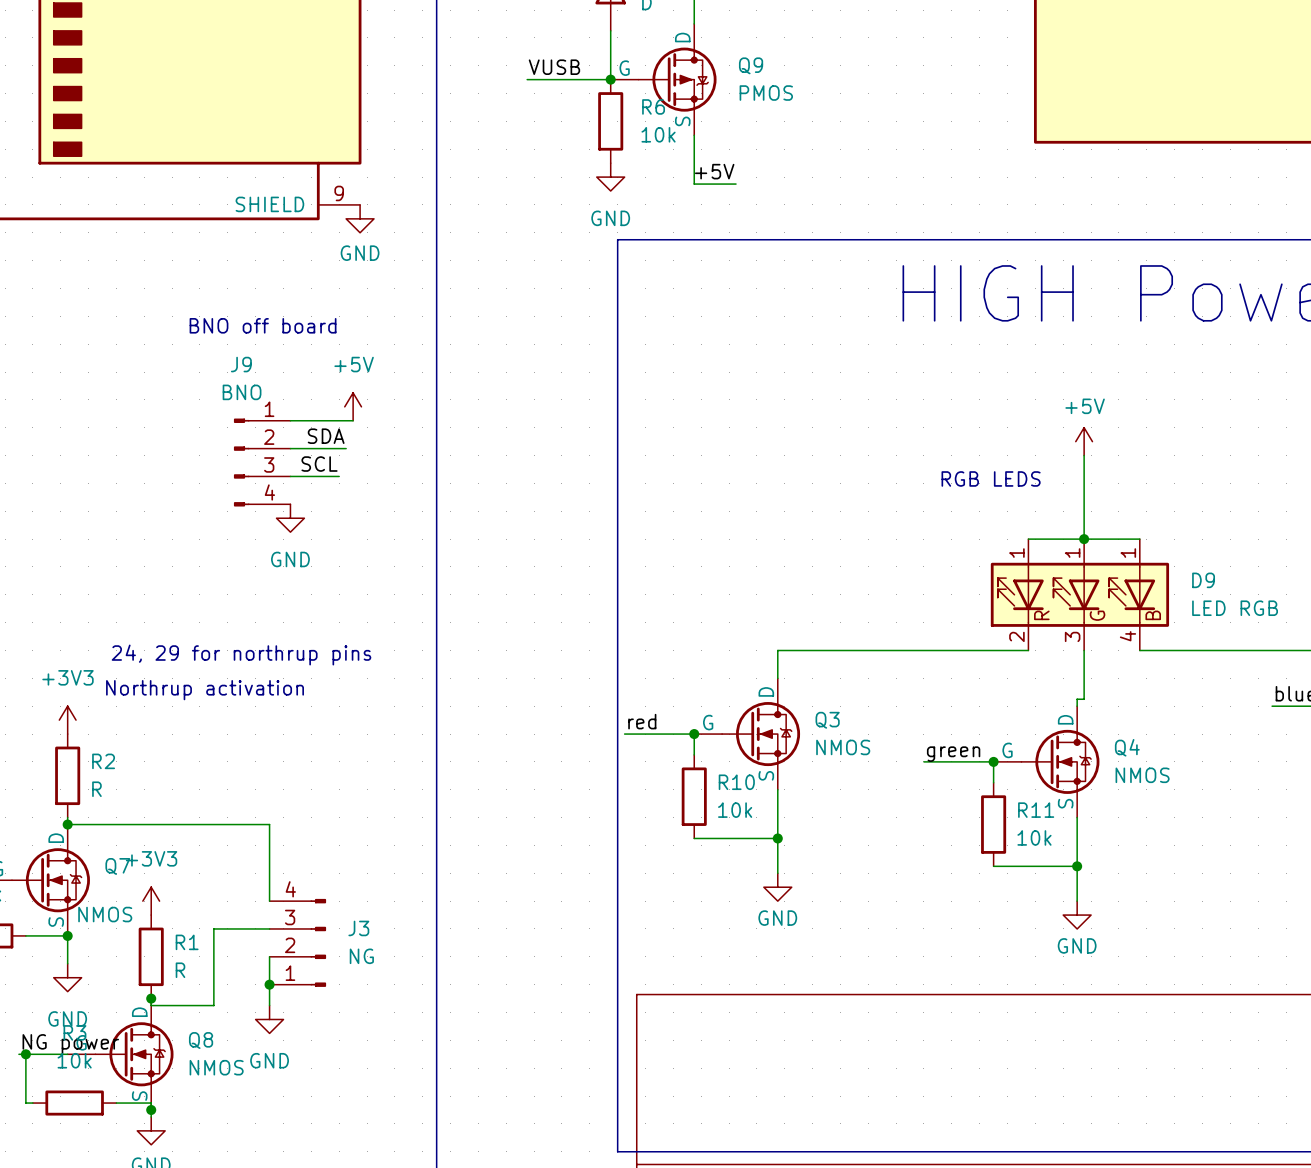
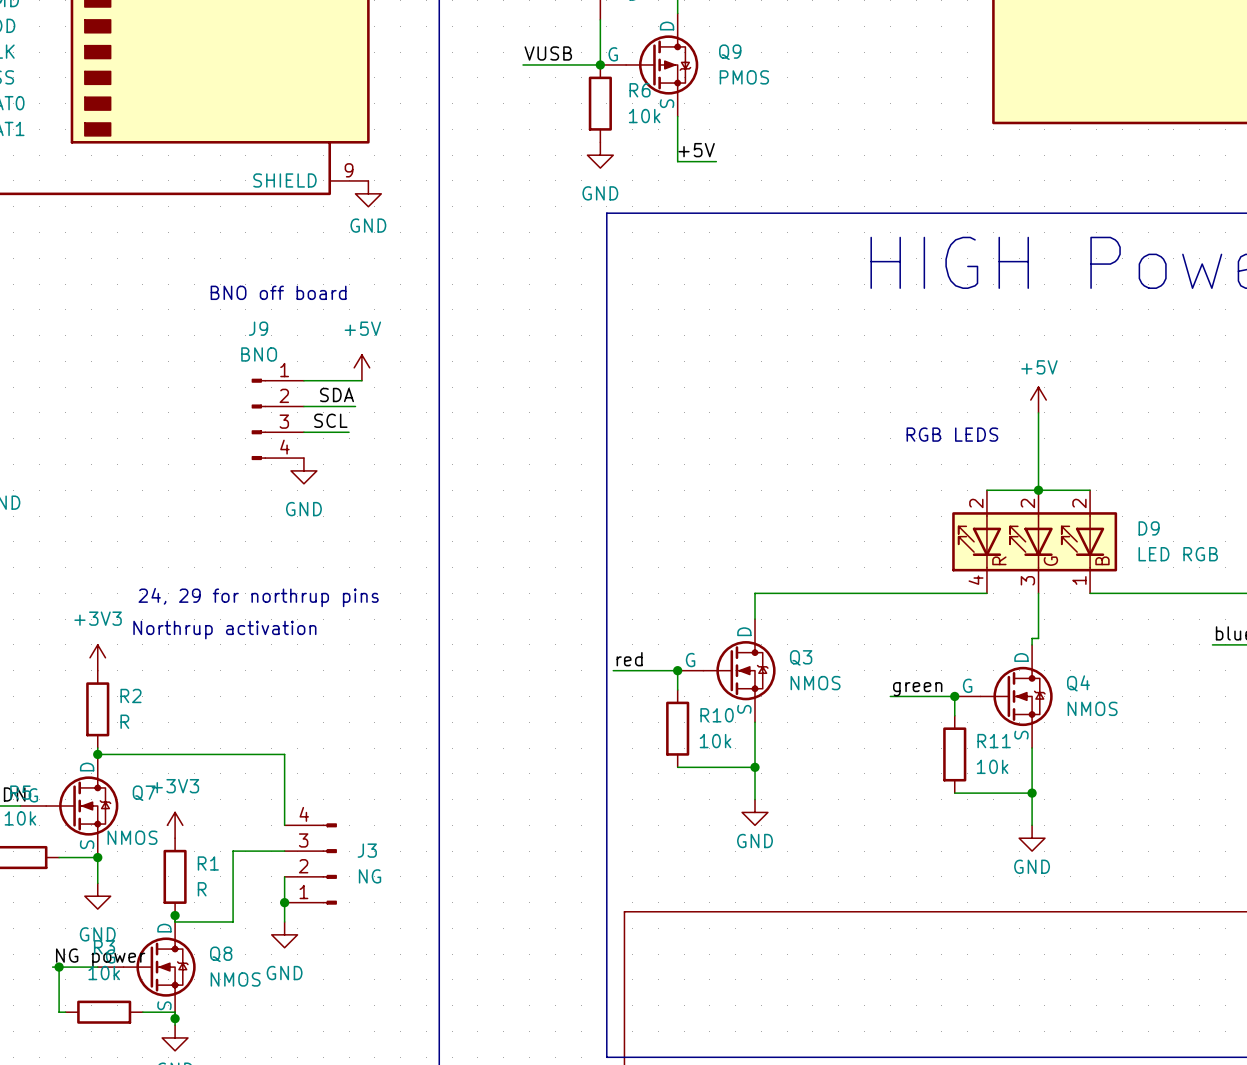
D9 pin number: 1 (1016, 553) -> 2 (976, 503)
D9 pin number: 1 (1072, 553) -> 2 (1027, 503)
D9 pin number: 1 (1128, 553) -> 2 (1079, 503)
D9 pin number: 2 (1016, 636) -> 4 (976, 580)
D9 pin number: 4 (1127, 636) -> 1 (1079, 580)

